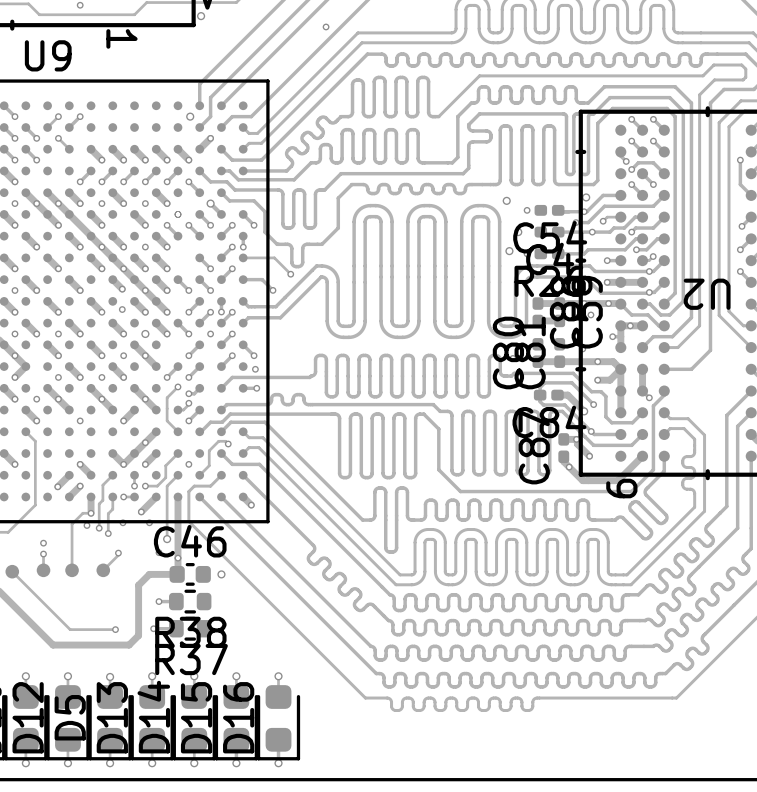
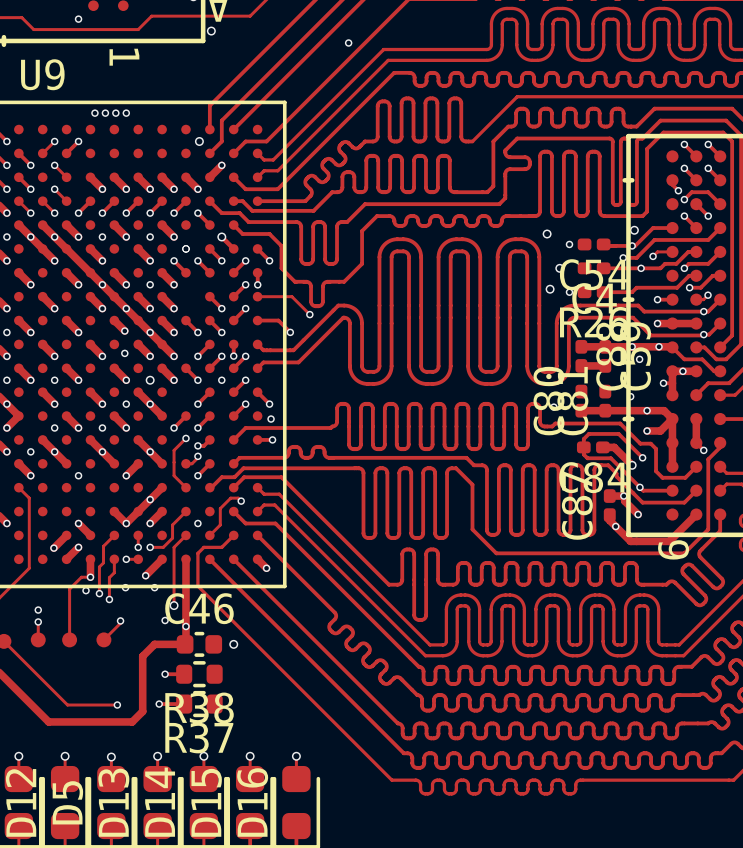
via: none -> (94, 113)
via: none -> (105, 113)
via: none -> (115, 113)
via: none -> (126, 113)
track: none -> (54, 189) (66, 201)
via: none -> (54, 189)
track: none -> (18, 201) (30, 213)
track: none -> (42, 201) (54, 213)
via: none -> (30, 213)
via: none -> (54, 213)

